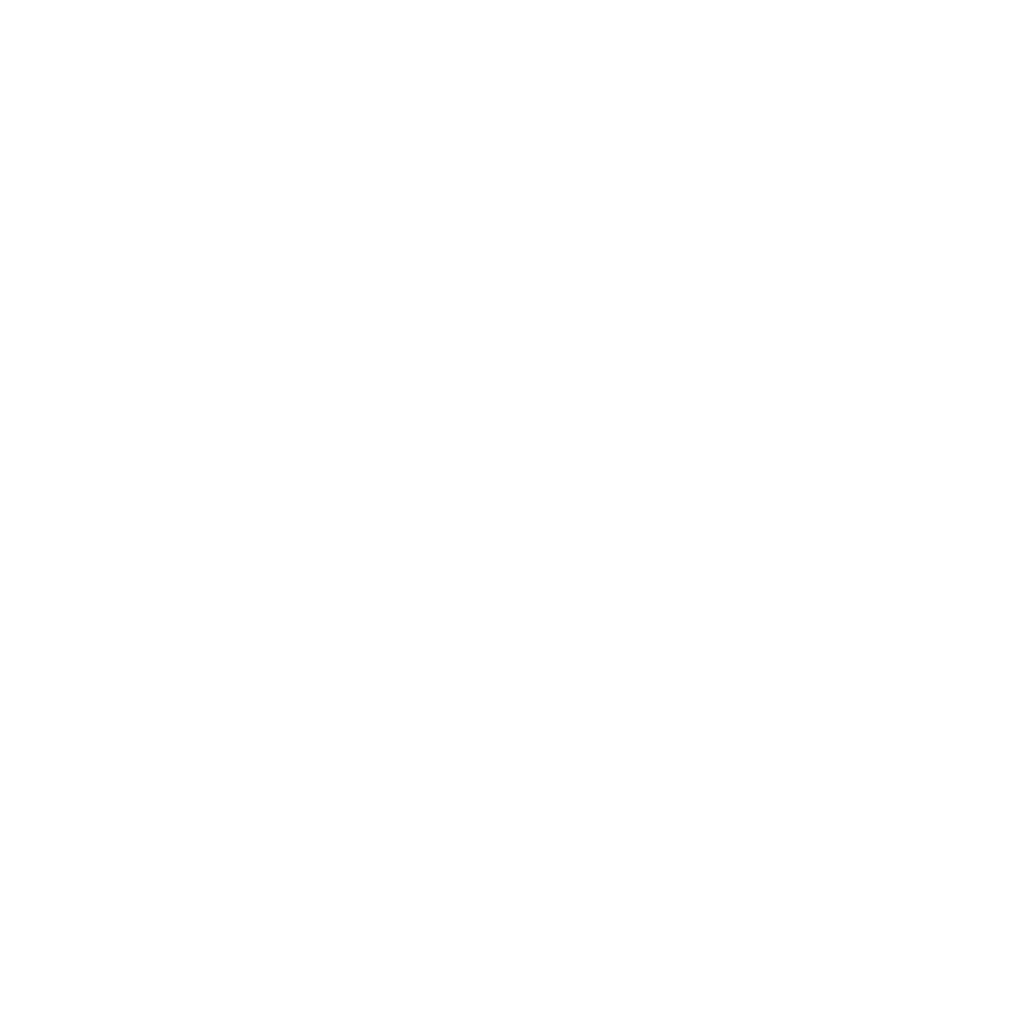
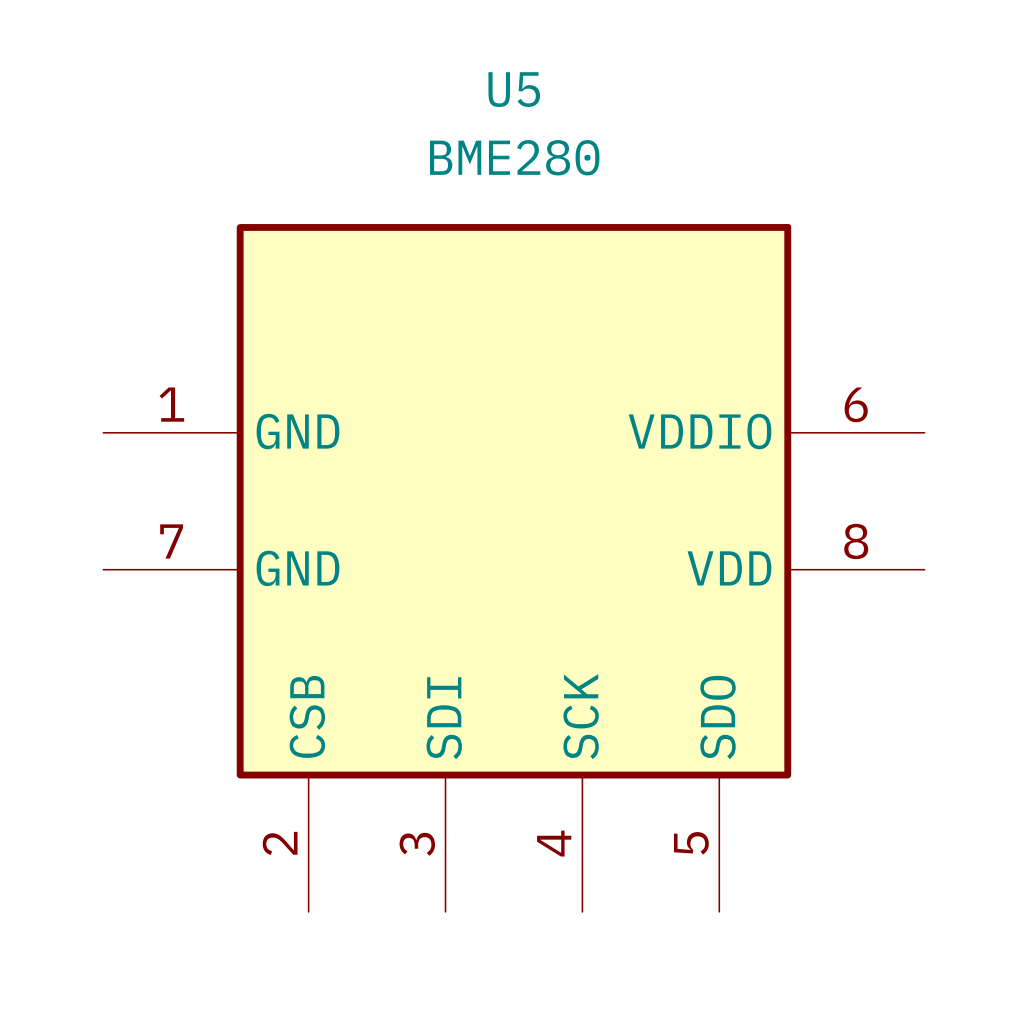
U5: none -> BME280 (513, 567)

